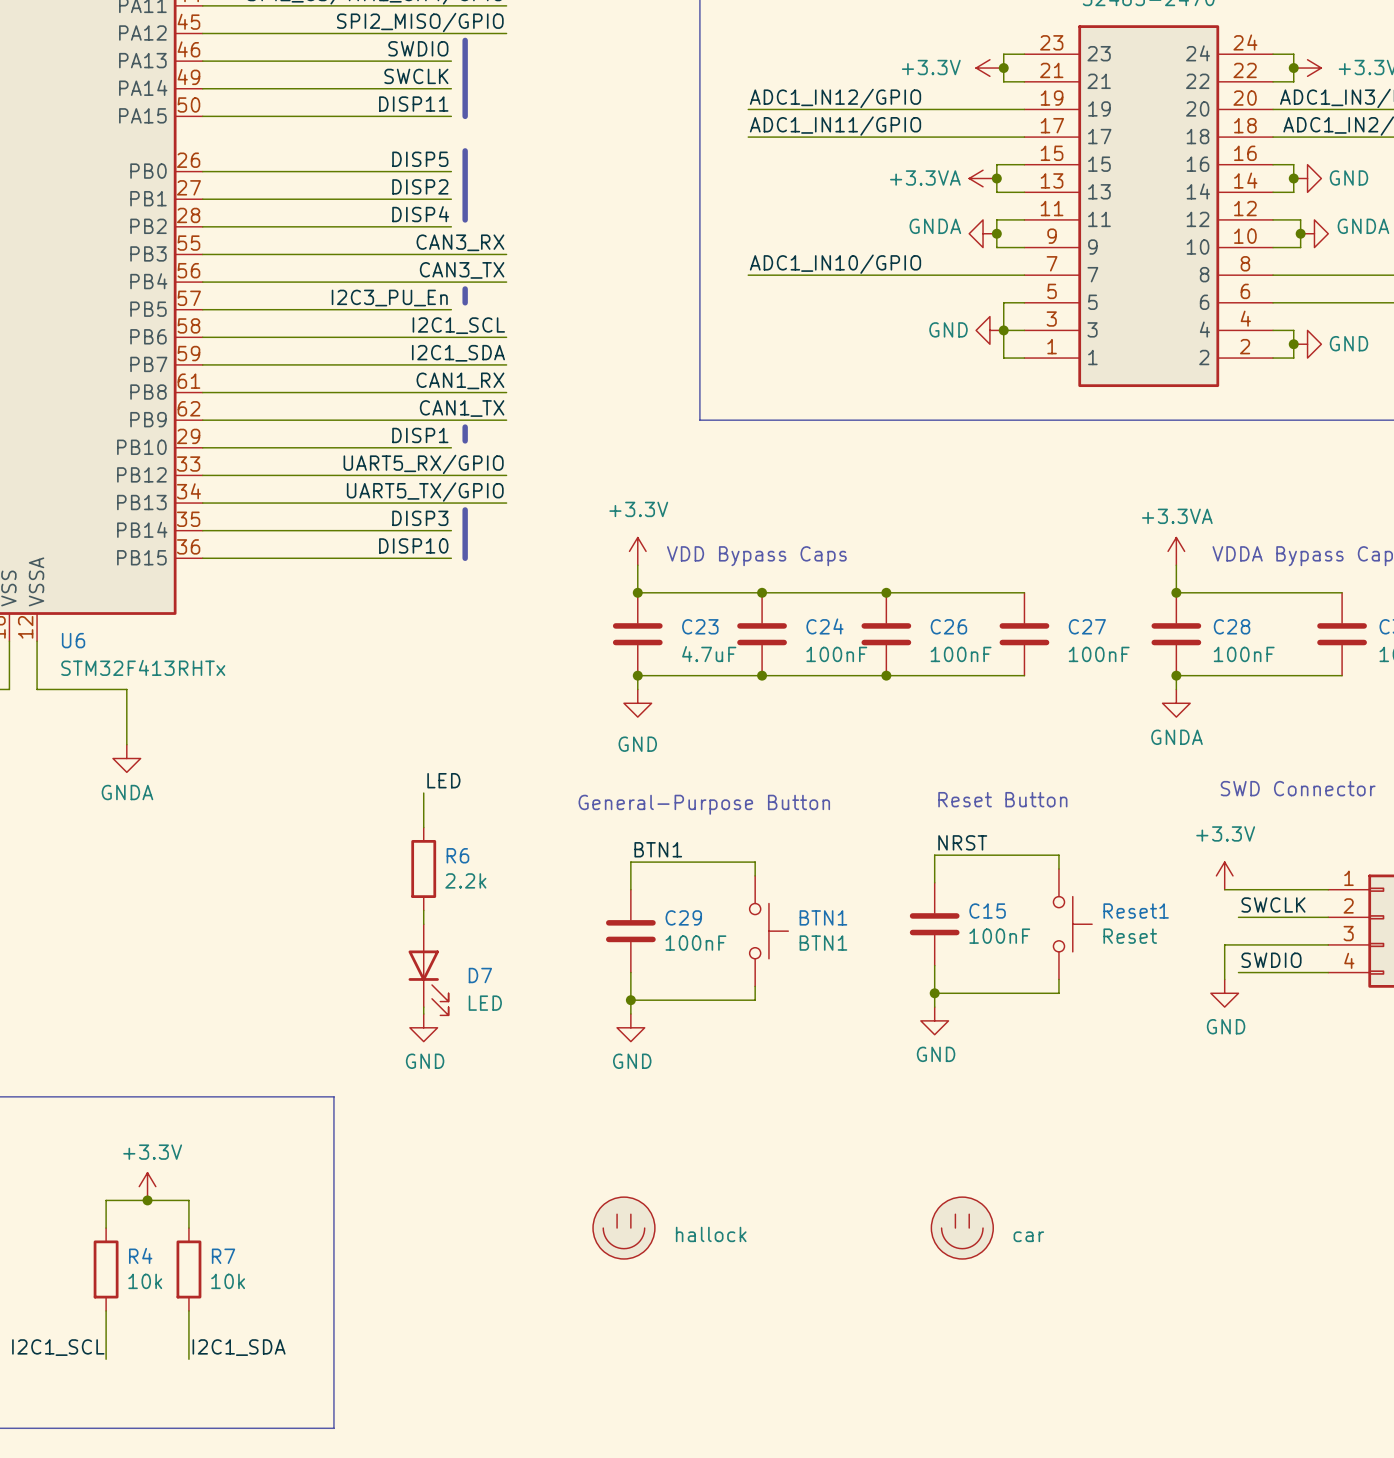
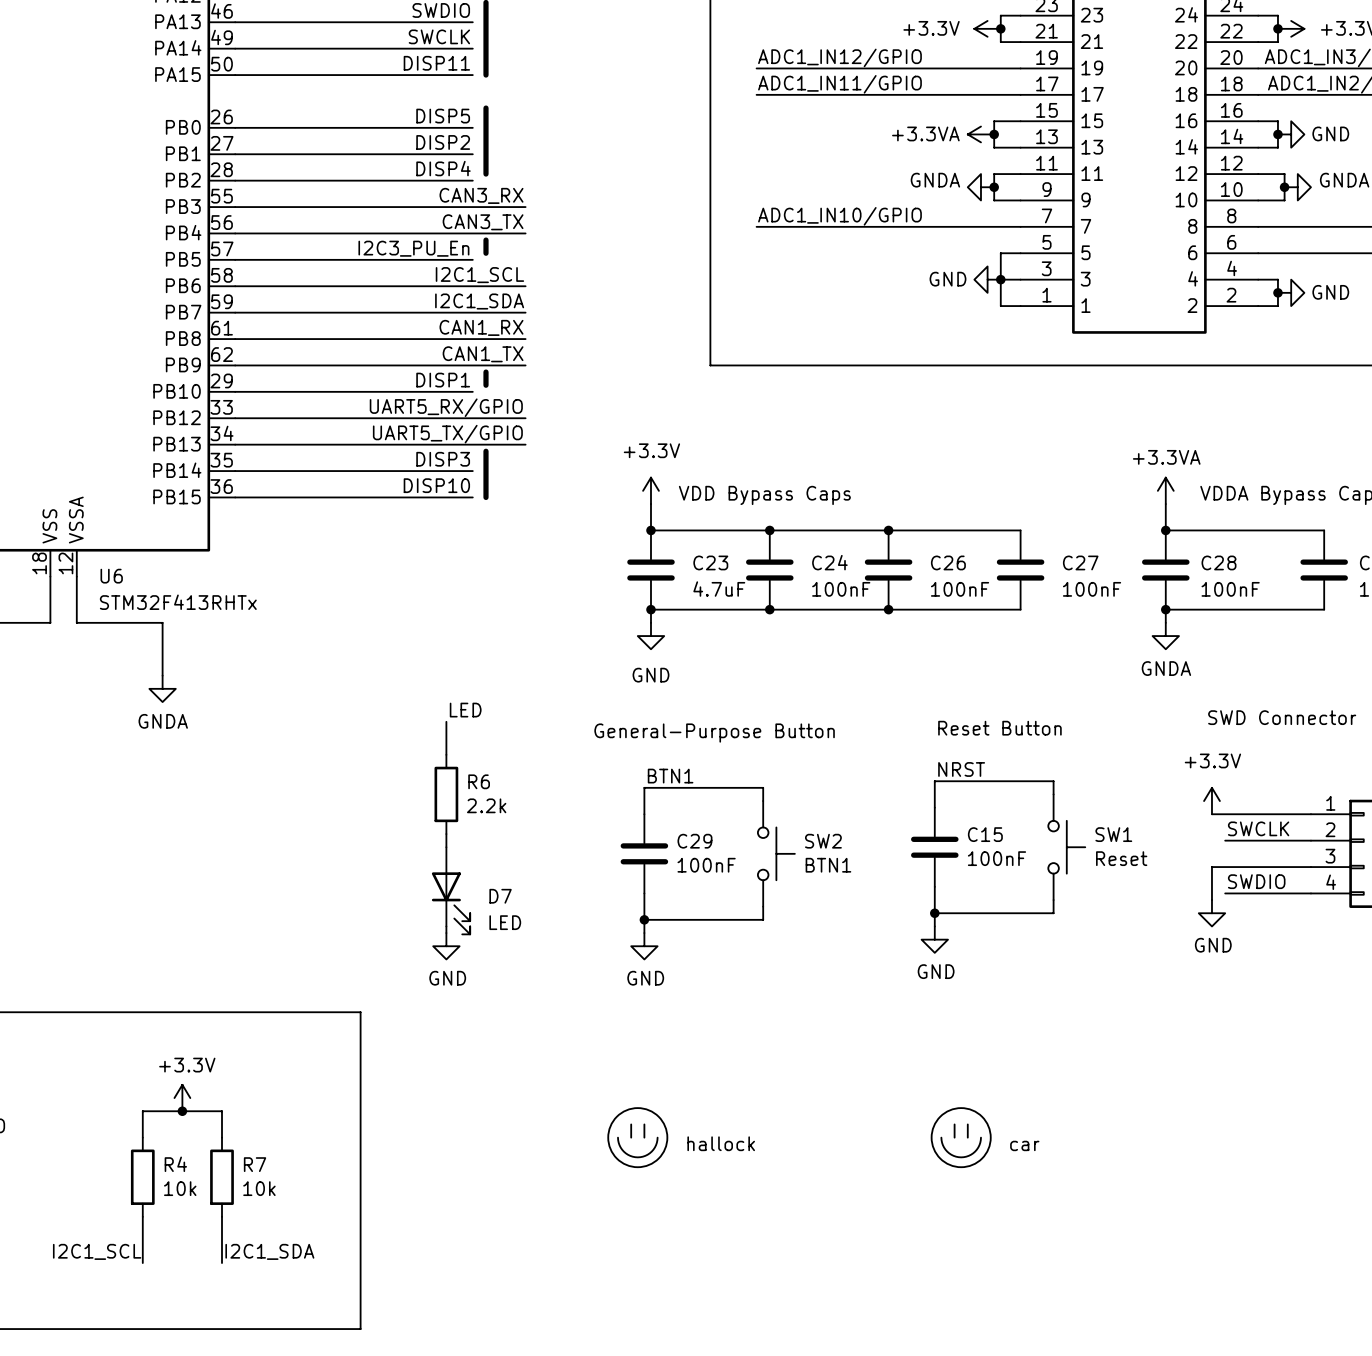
Reset1 name: Reset1 (1136, 911) -> SW1 (1113, 834)
BTN1 name: BTN1 (823, 917) -> SW2 (823, 841)

